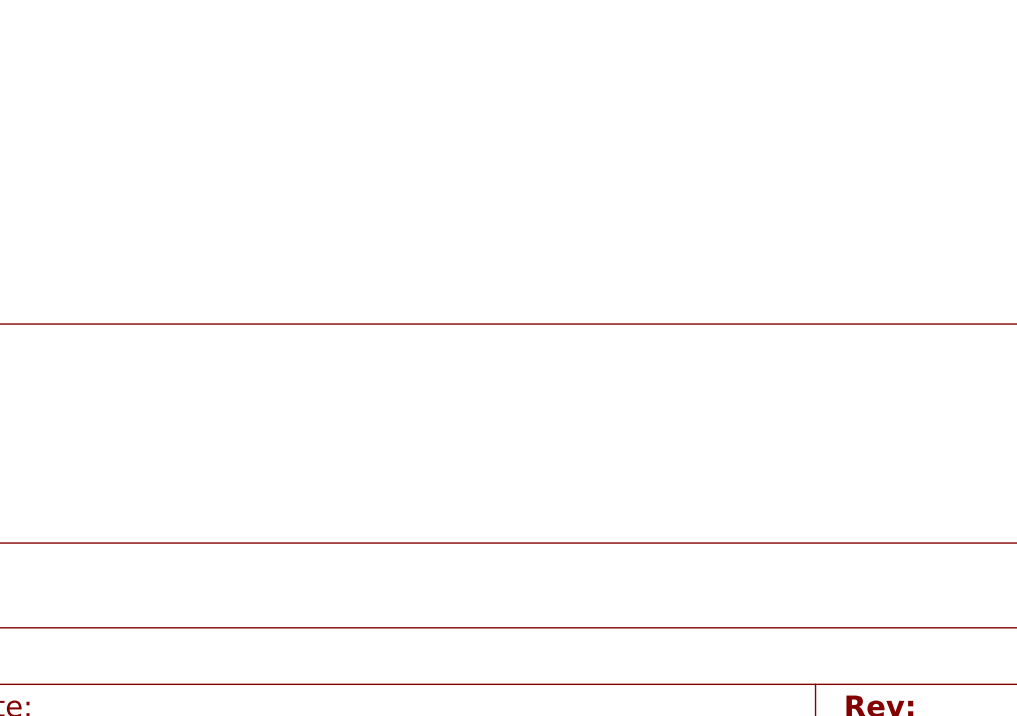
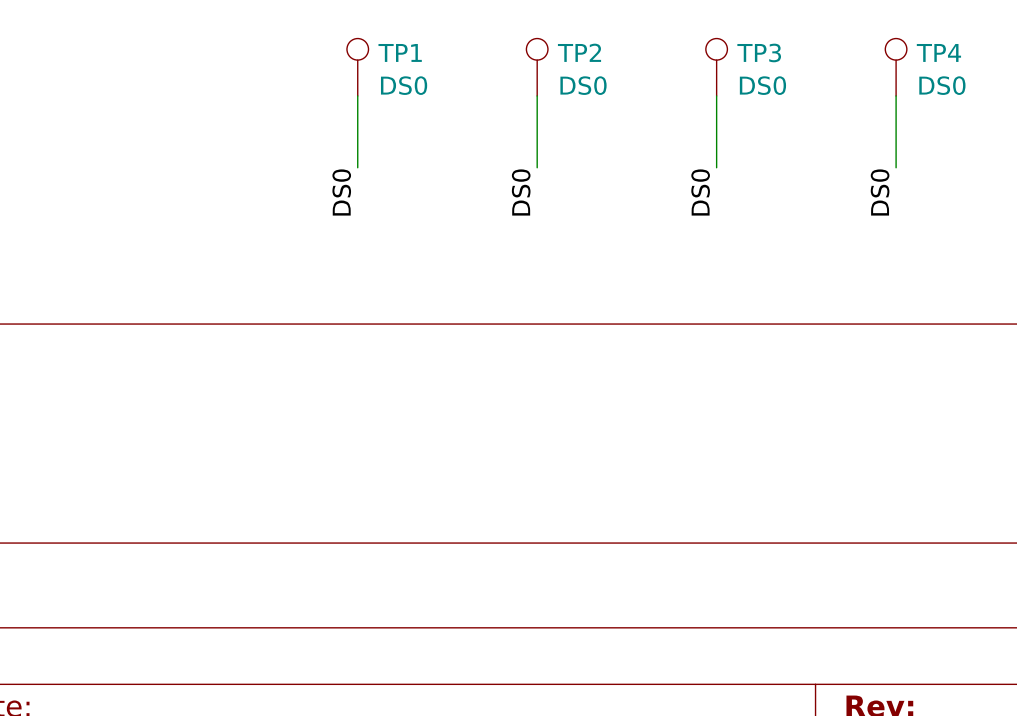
TP1: none -> DS0 (357, 67)
TP2: none -> DS0 (537, 67)
TP3: none -> DS0 (716, 67)
TP4: none -> DS0 (896, 67)
wire: none -> (357, 95) (357, 167)
wire: none -> (537, 95) (537, 167)
wire: none -> (716, 95) (716, 167)
wire: none -> (896, 95) (896, 167)
label: none -> DS0 (341, 192)
label: none -> DS0 (521, 192)
label: none -> DS0 (700, 192)
label: none -> DS0 (880, 192)

